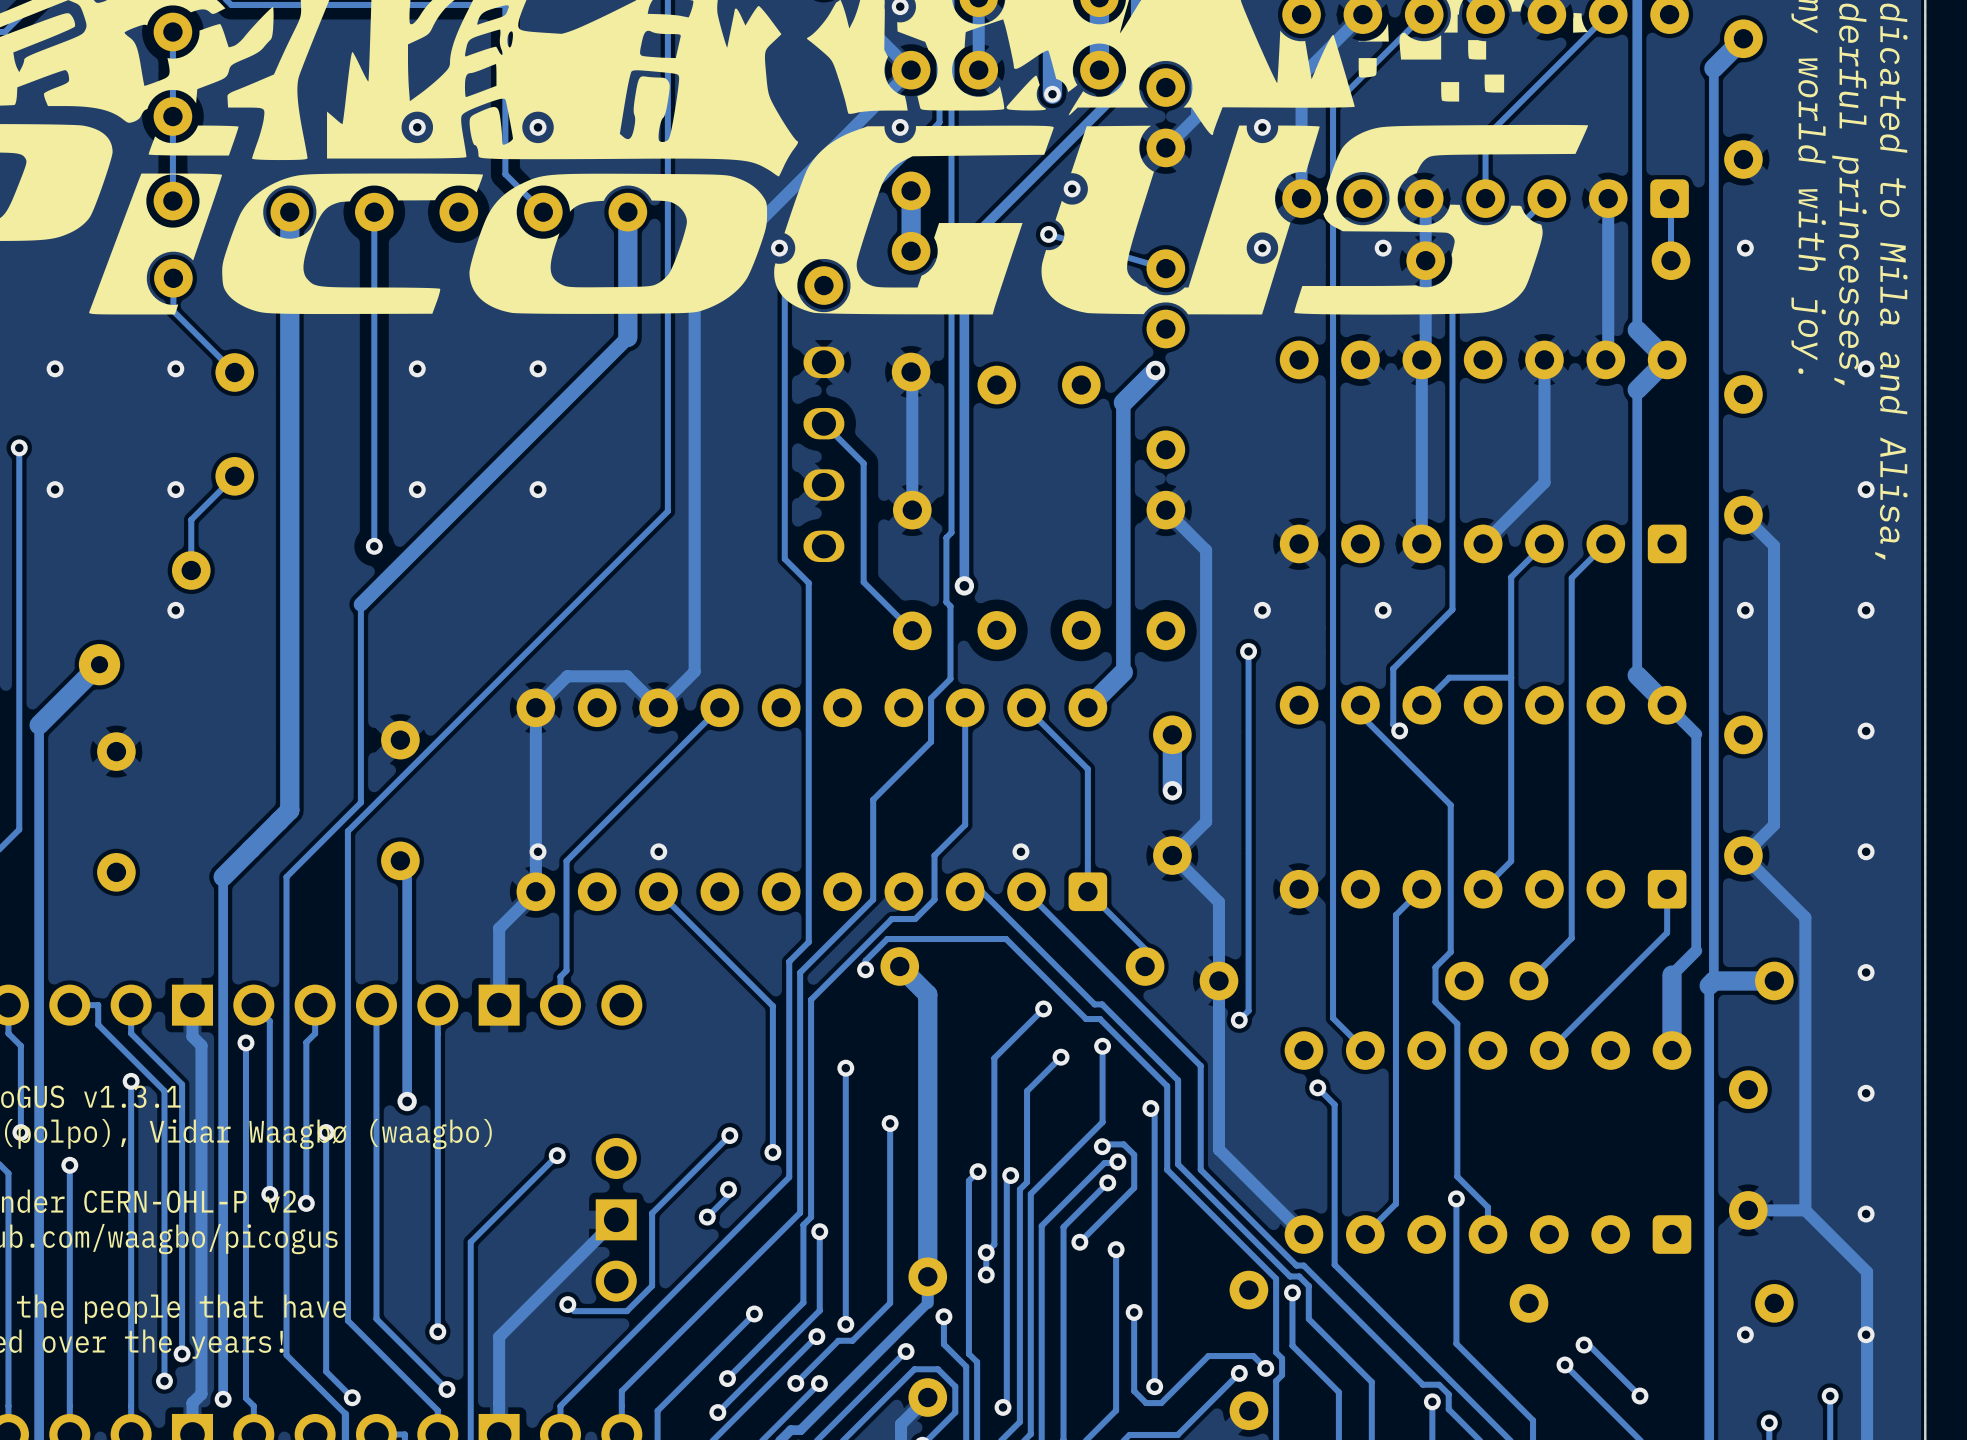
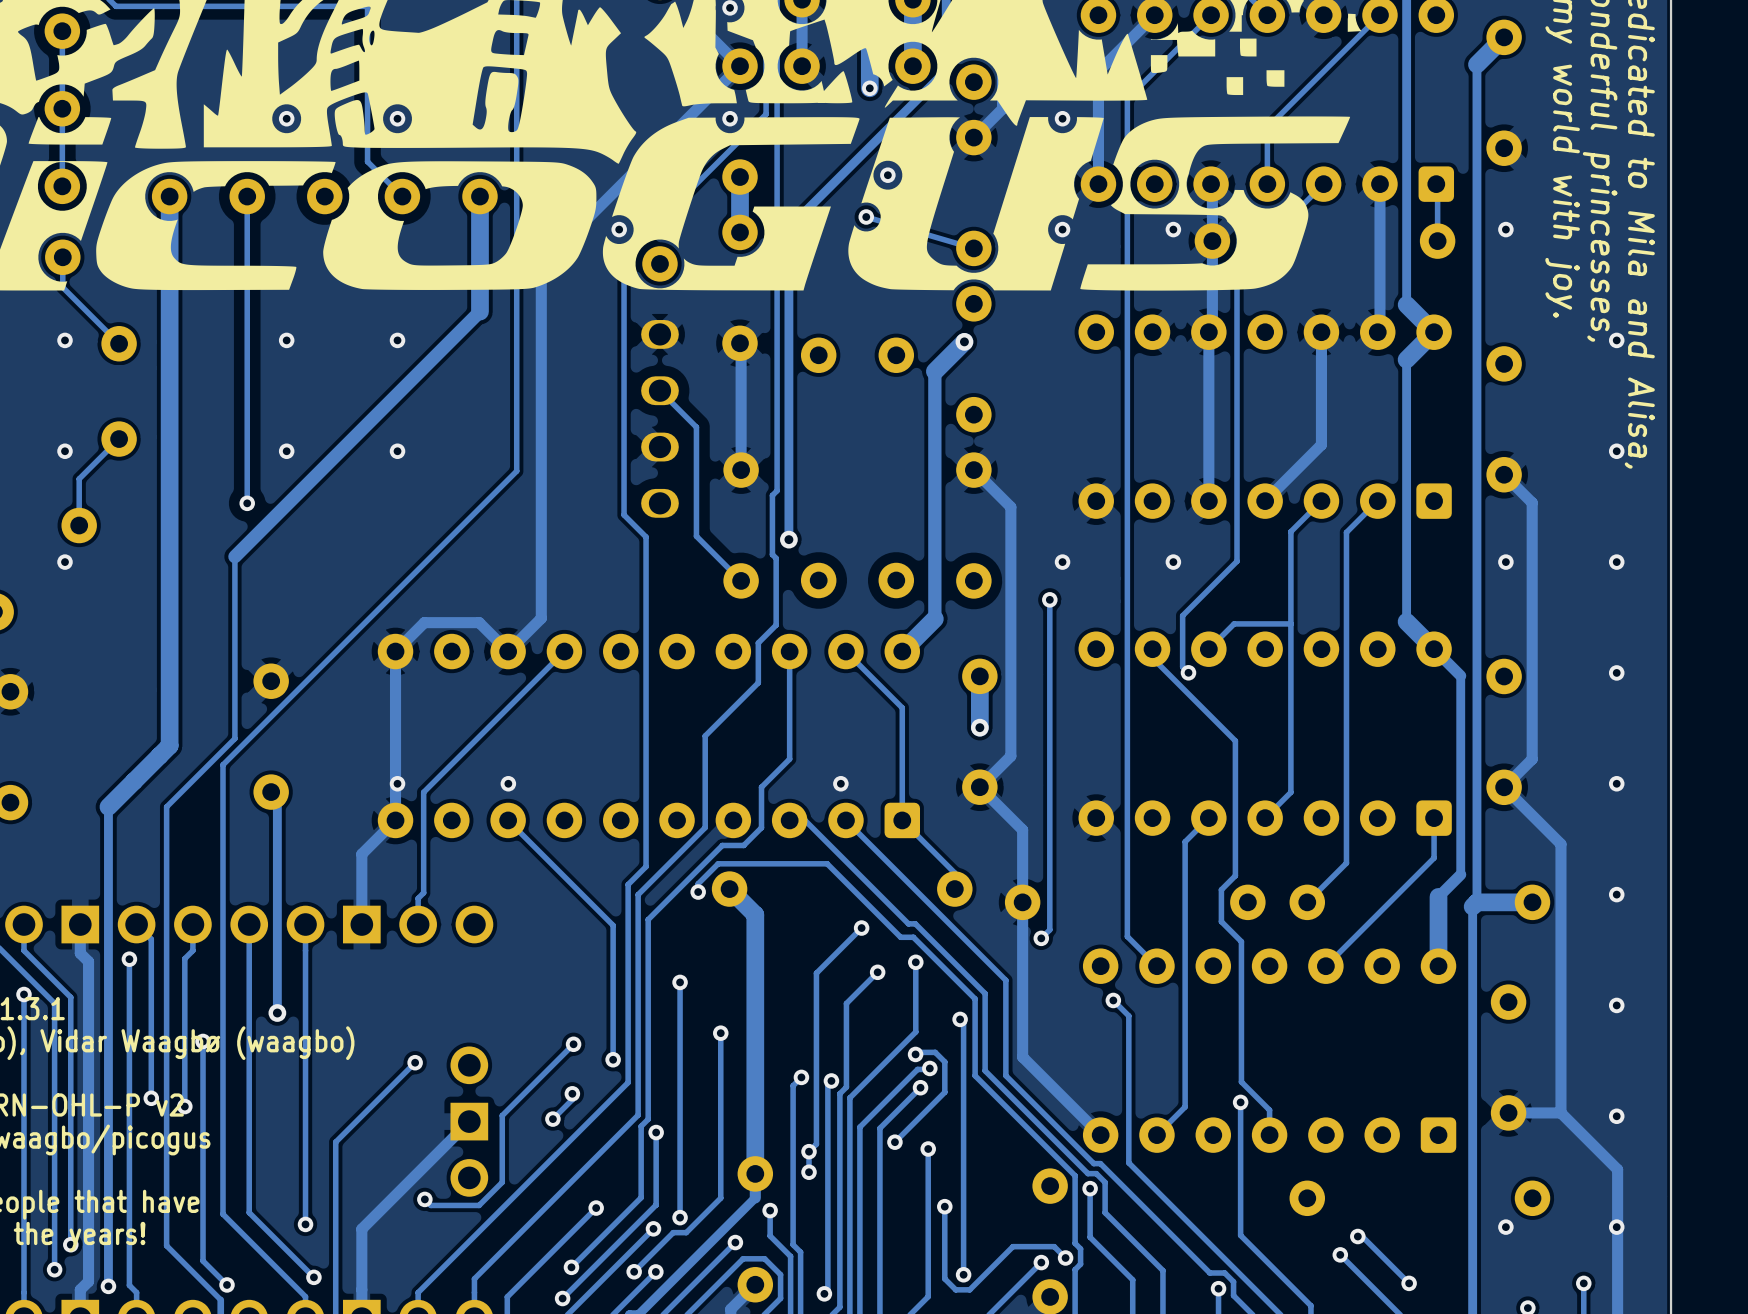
drawing shape: [1399, 32, 1442, 60] -> [1176, 30, 1216, 57]
drawing shape: [1468, 40, 1487, 60] -> [1239, 38, 1257, 57]
drawing shape: [1006, 75, 1046, 111] -> [816, 71, 853, 104]
drawing shape: [1294, 124, 1589, 315] -> [1080, 116, 1351, 291]
drawing shape: [148, 125, 239, 156] -> [28, 117, 112, 145]
drawing shape: [774, 125, 1054, 315] -> [602, 117, 860, 291]
drawing shape: [1041, 125, 1320, 315] -> [848, 117, 1104, 291]
drawing shape: [222, 173, 483, 315] -> [96, 161, 336, 291]
drawing shape: [469, 173, 768, 314] -> [323, 161, 597, 290]

